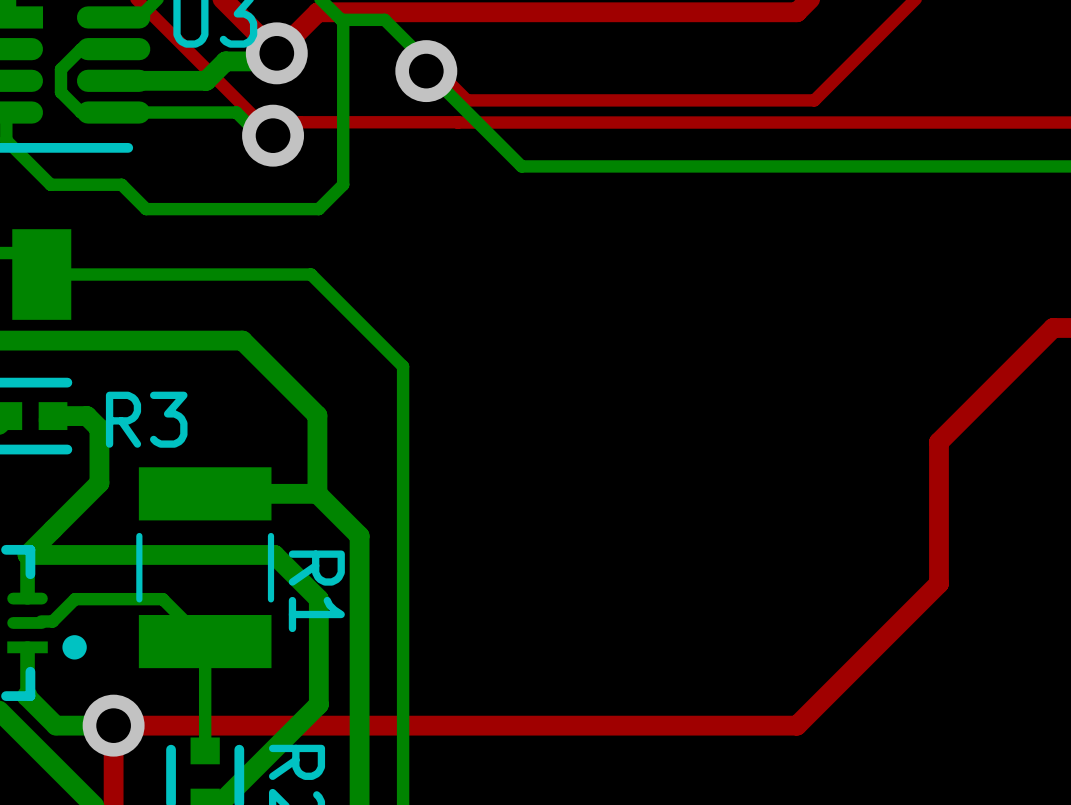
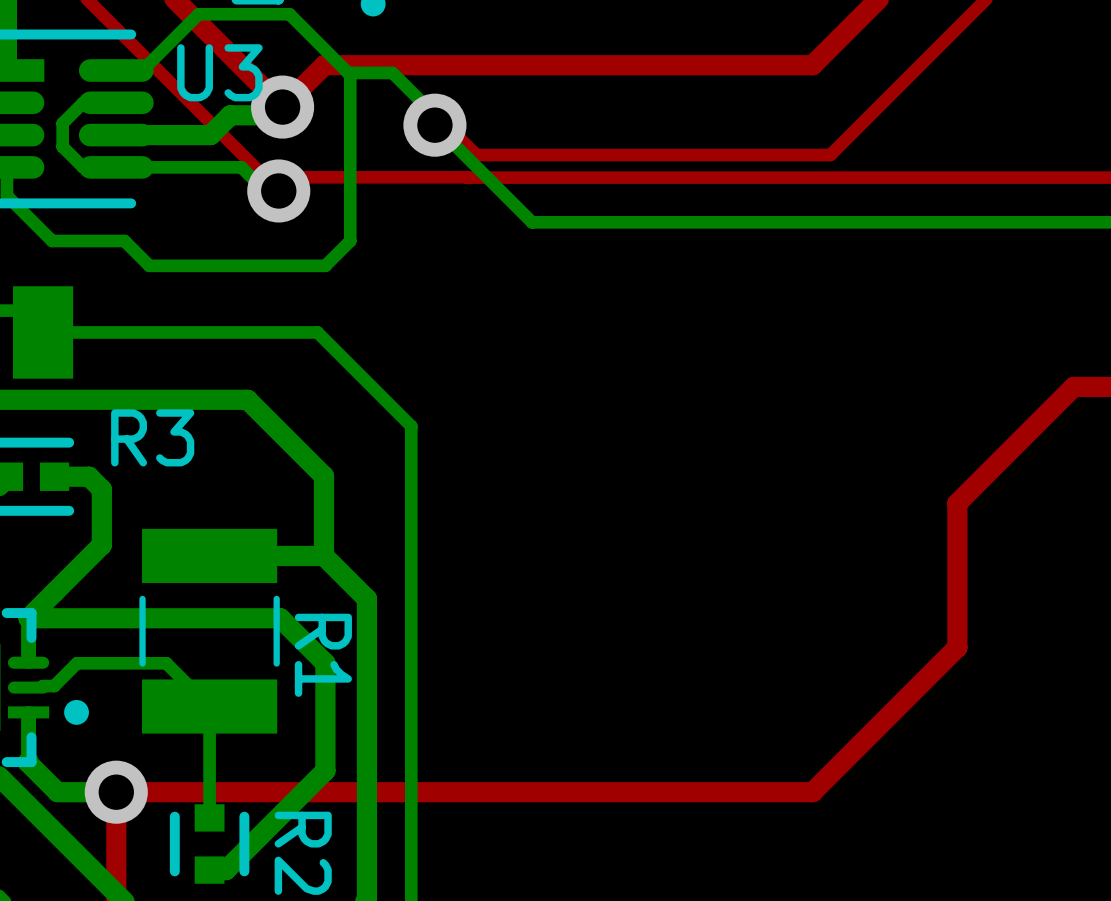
R3 name position: R3 (146, 419) -> R3 (152, 437)

